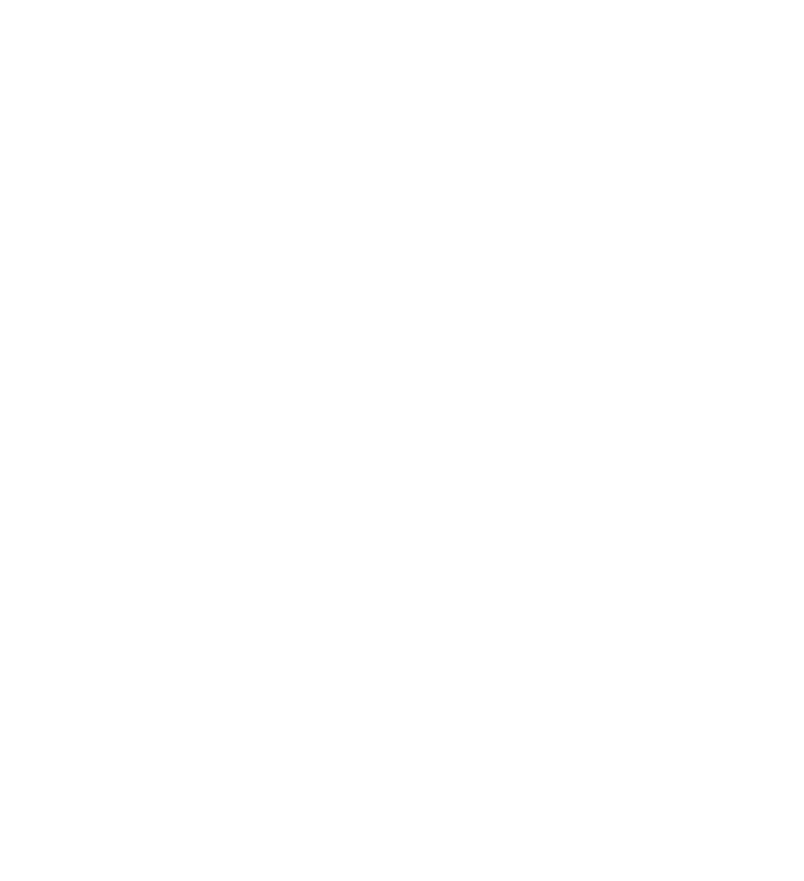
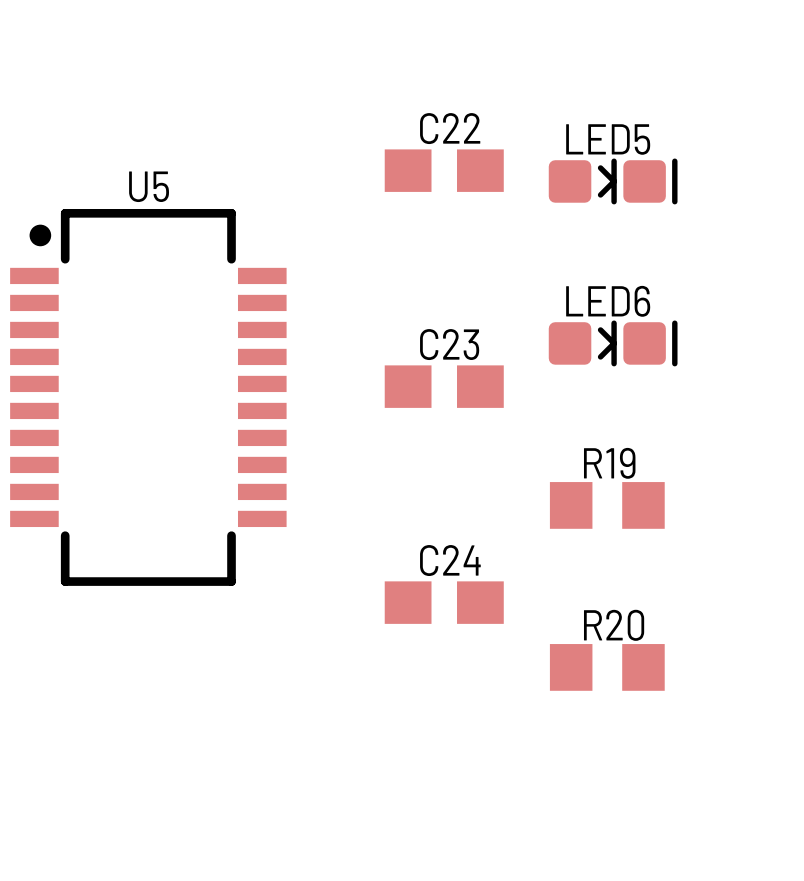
C22: none -> (444, 170)
LED5: none -> (613, 181)
LED6: none -> (613, 343)
C23: none -> (444, 386)
U5: none -> (148, 397)
R19: none -> (607, 505)
C24: none -> (444, 602)
R20: none -> (607, 667)

